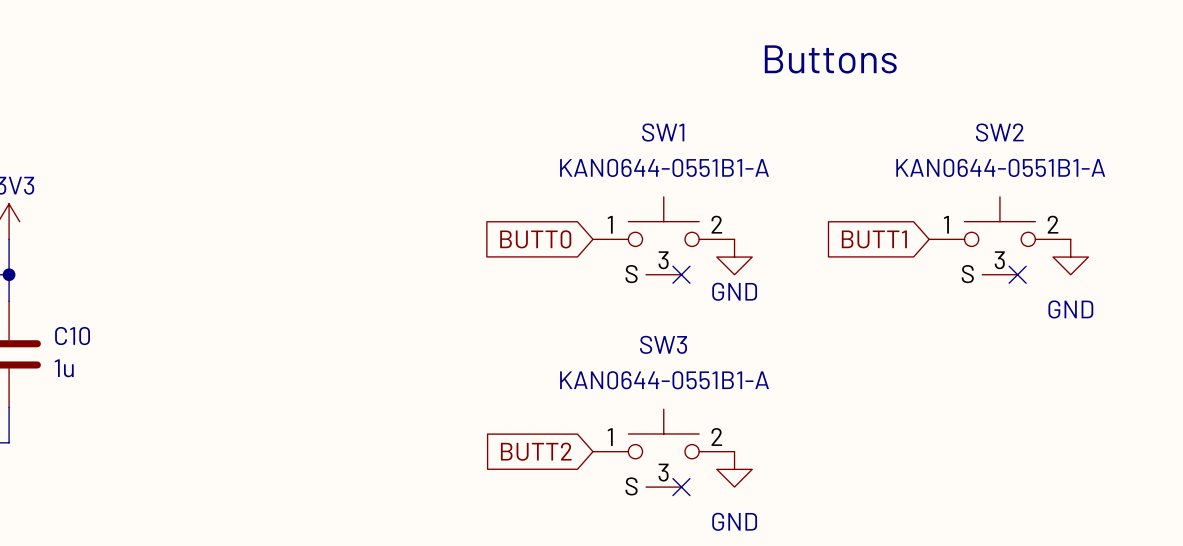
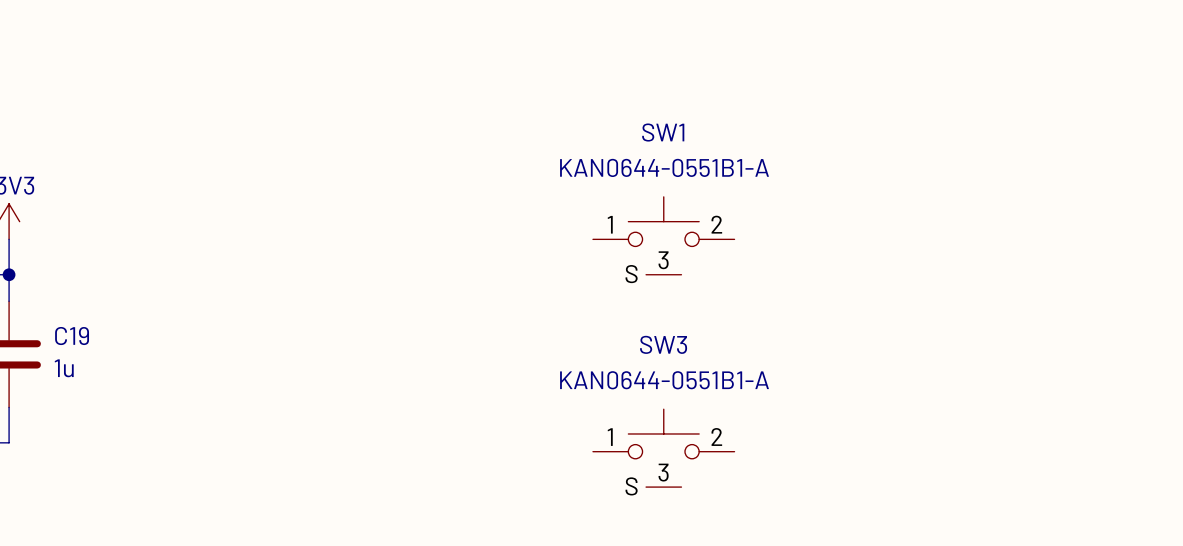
text: Buttons (830, 59) -> none
SW2: KAN0644-0551B1-A (999, 235) -> none
global label: BUTT0 (535, 239) -> none
global label: BUTT1 (874, 239) -> none
power symbol: GND (734, 257) -> none
power symbol: GND (1070, 257) -> none
no-connect mark: (681, 274) -> none
no-connect mark: (1017, 274) -> none
C10 name: C10 (72, 336) -> C19 (72, 336)
global label: BUTT2 (536, 451) -> none
power symbol: GND (734, 469) -> none
no-connect mark: (681, 487) -> none

